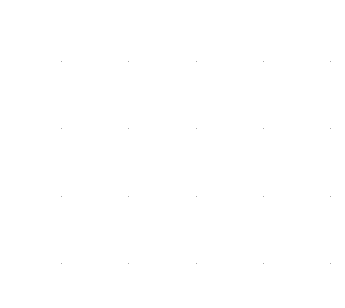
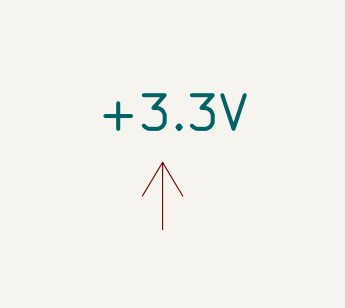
power symbol: none -> +3.3V (162, 196)

